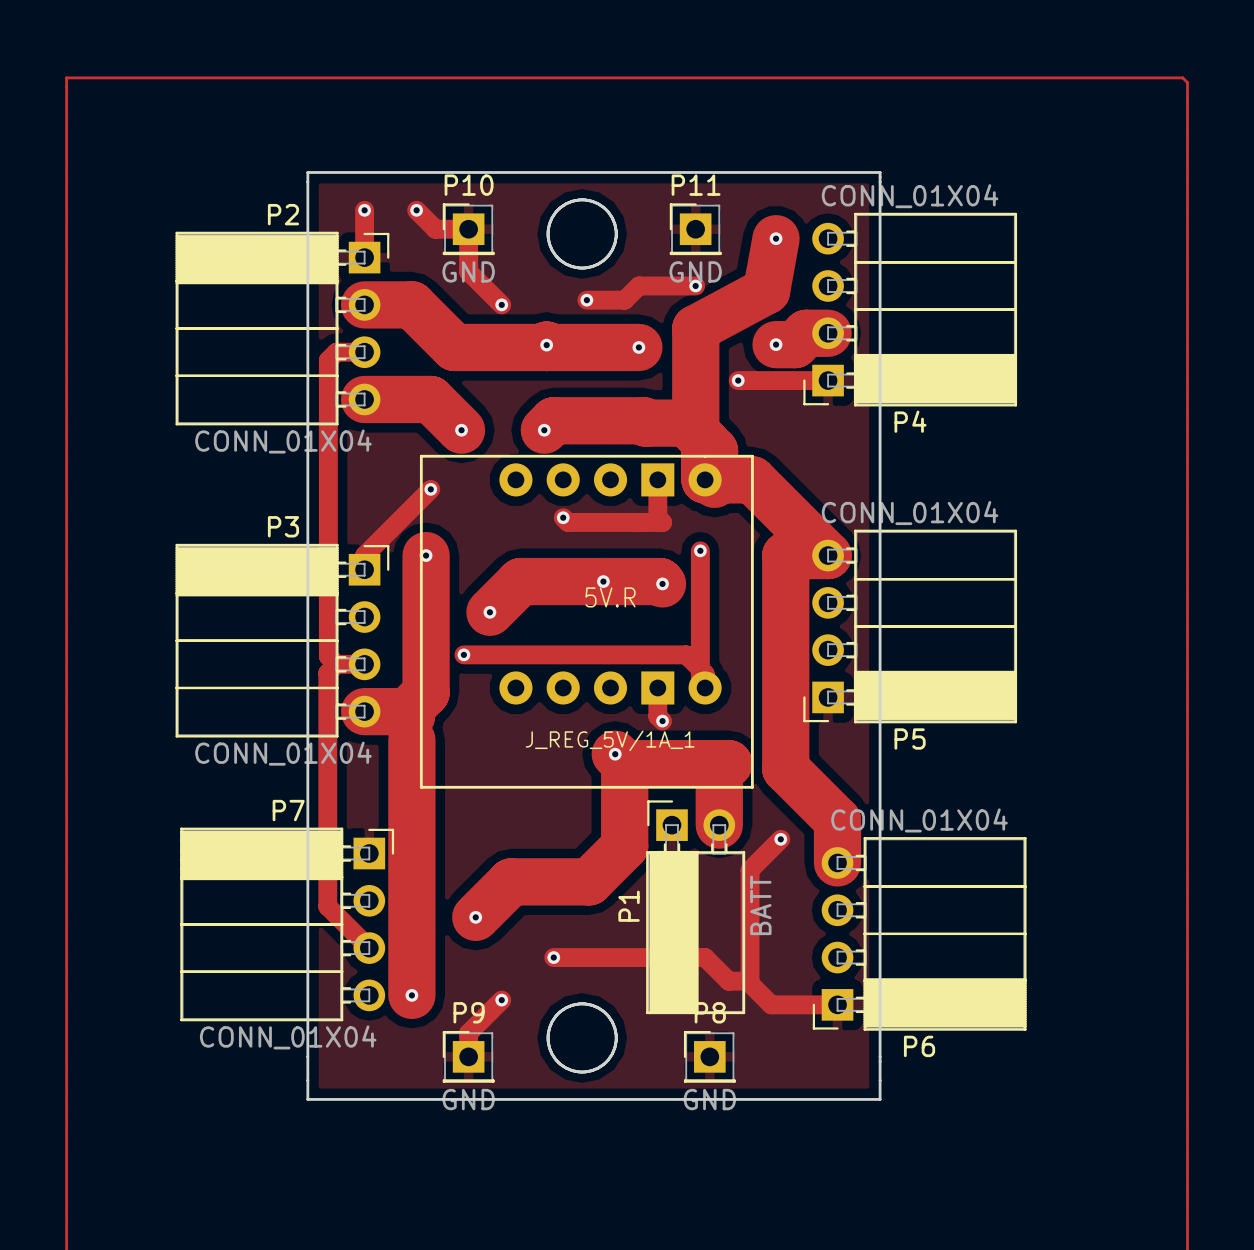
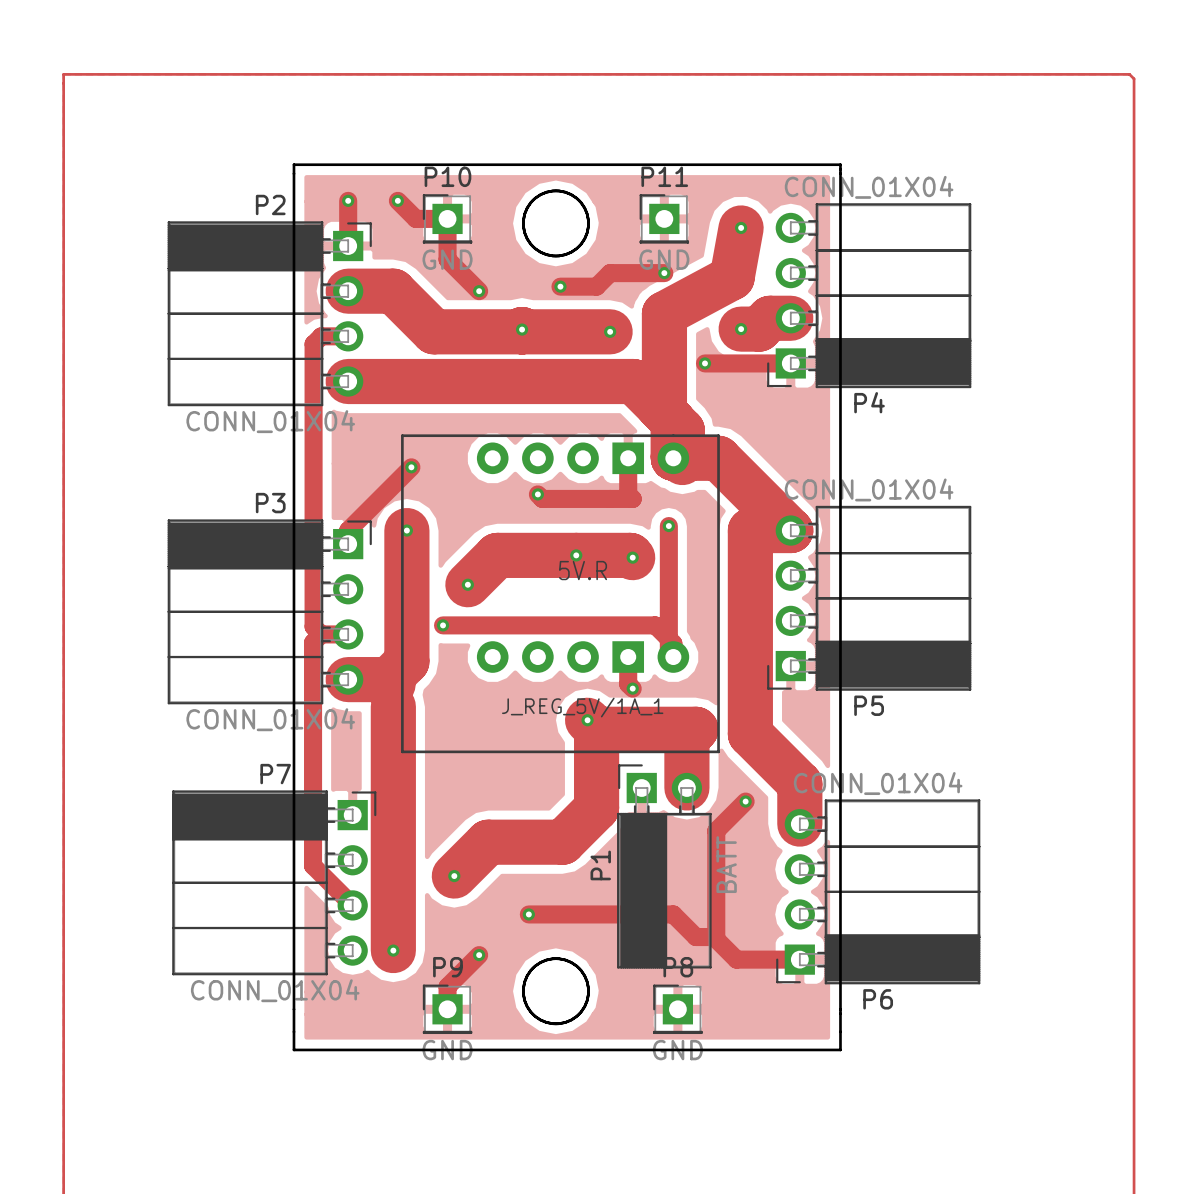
track: (430, 399) (461, 430) -> (411, 381) (633, 381) (673, 421)
track: (689, 425) (686, 423) (645, 423) (643, 420) (553, 420) (544, 430) -> none
via: (461, 430) -> none
via: (544, 430) -> none

